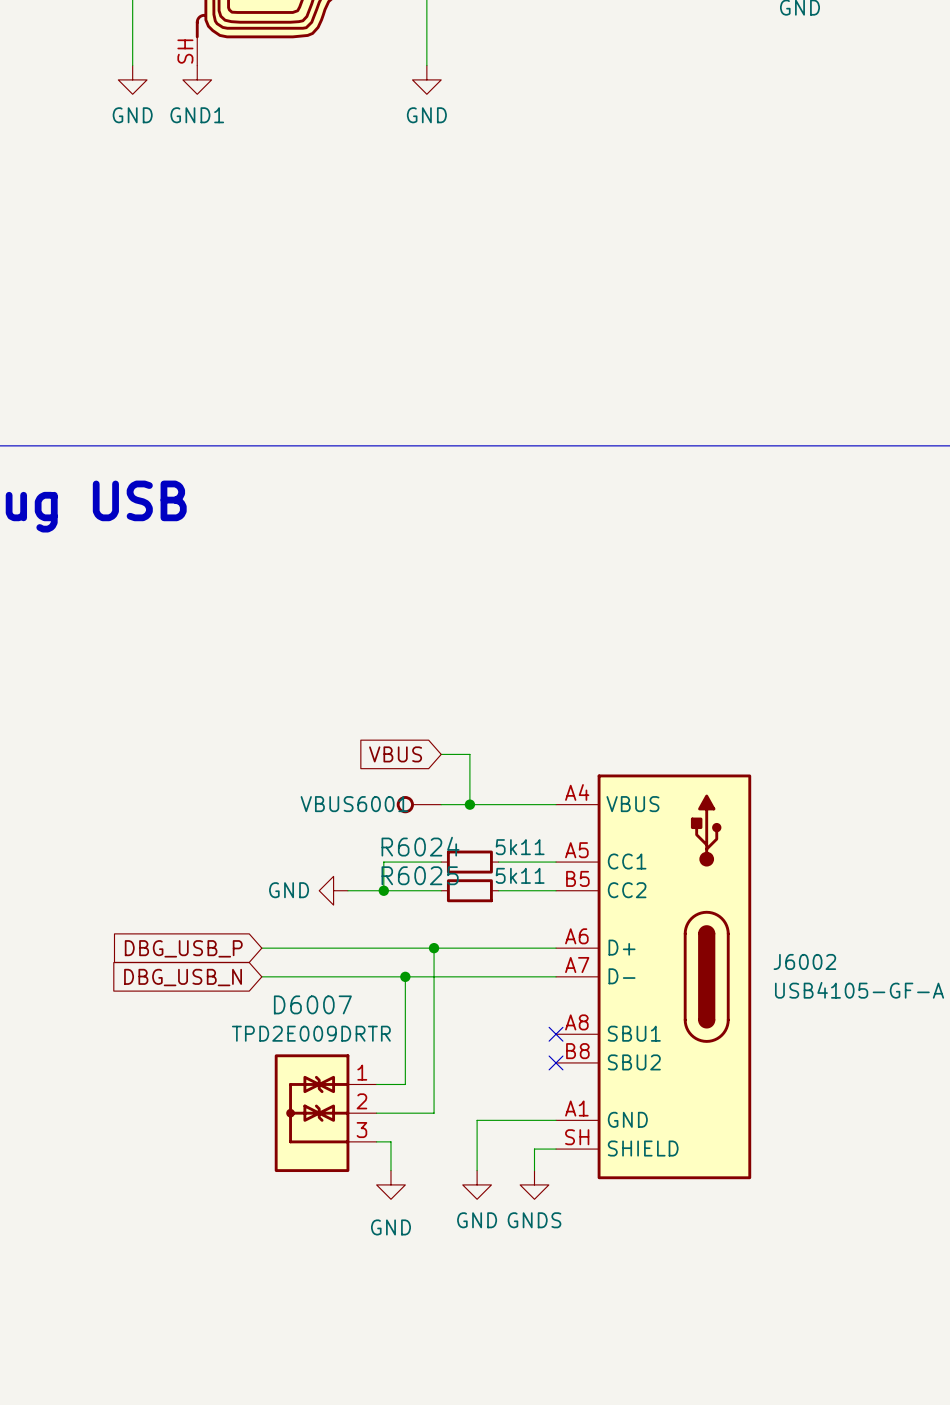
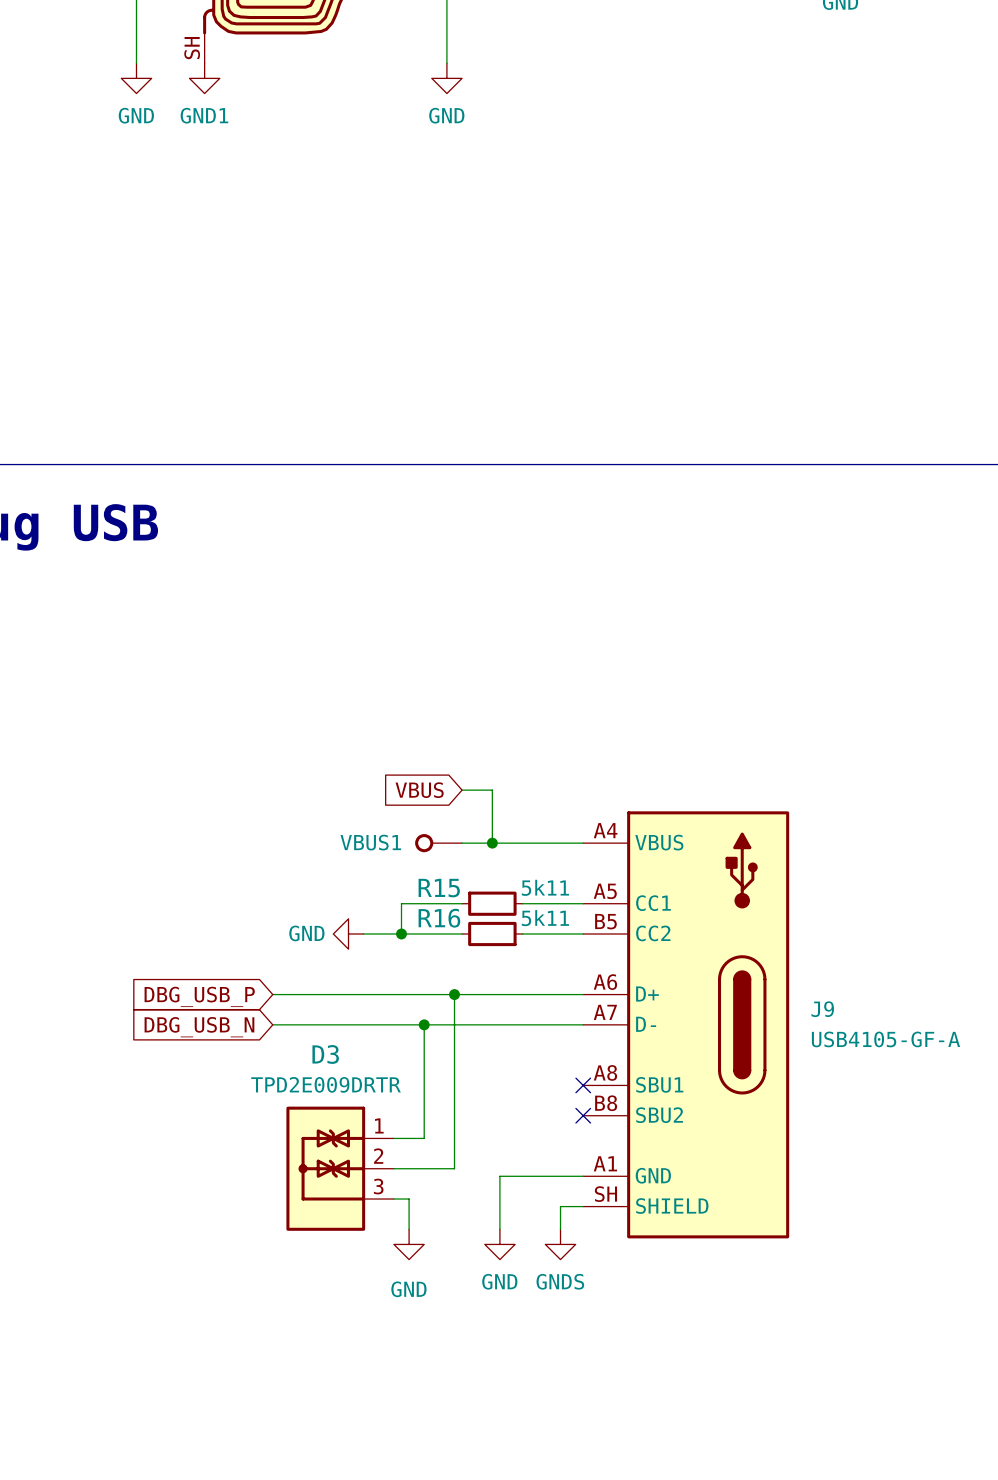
VBUS6001 name: VBUS6001 (354, 804) -> VBUS1 (370, 842)
R6024 name: R6024 (420, 846) -> R15 (439, 888)
R6025 name: R6025 (420, 875) -> R16 (439, 918)
J6002 name: J6002 (804, 961) -> J9 (822, 1009)
D6007 name: D6007 (312, 1004) -> D3 (325, 1054)

